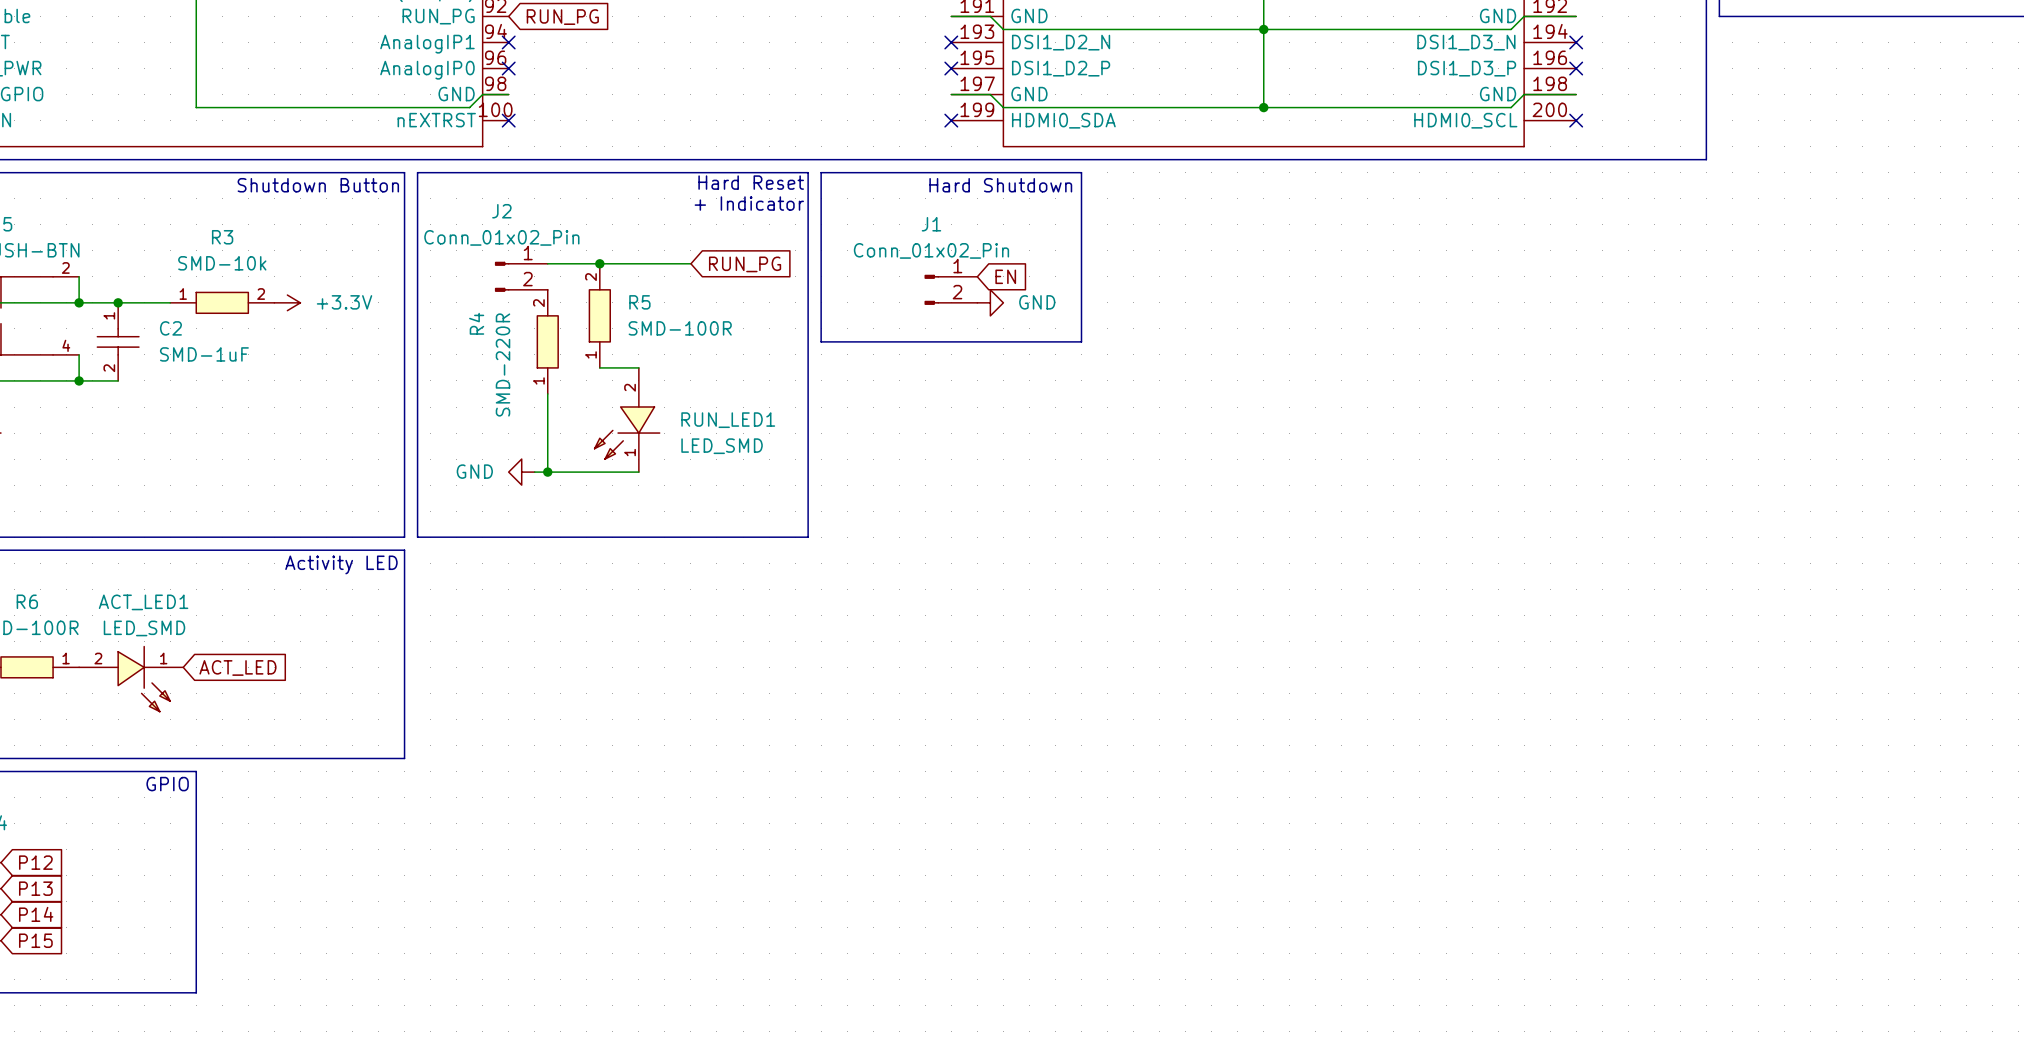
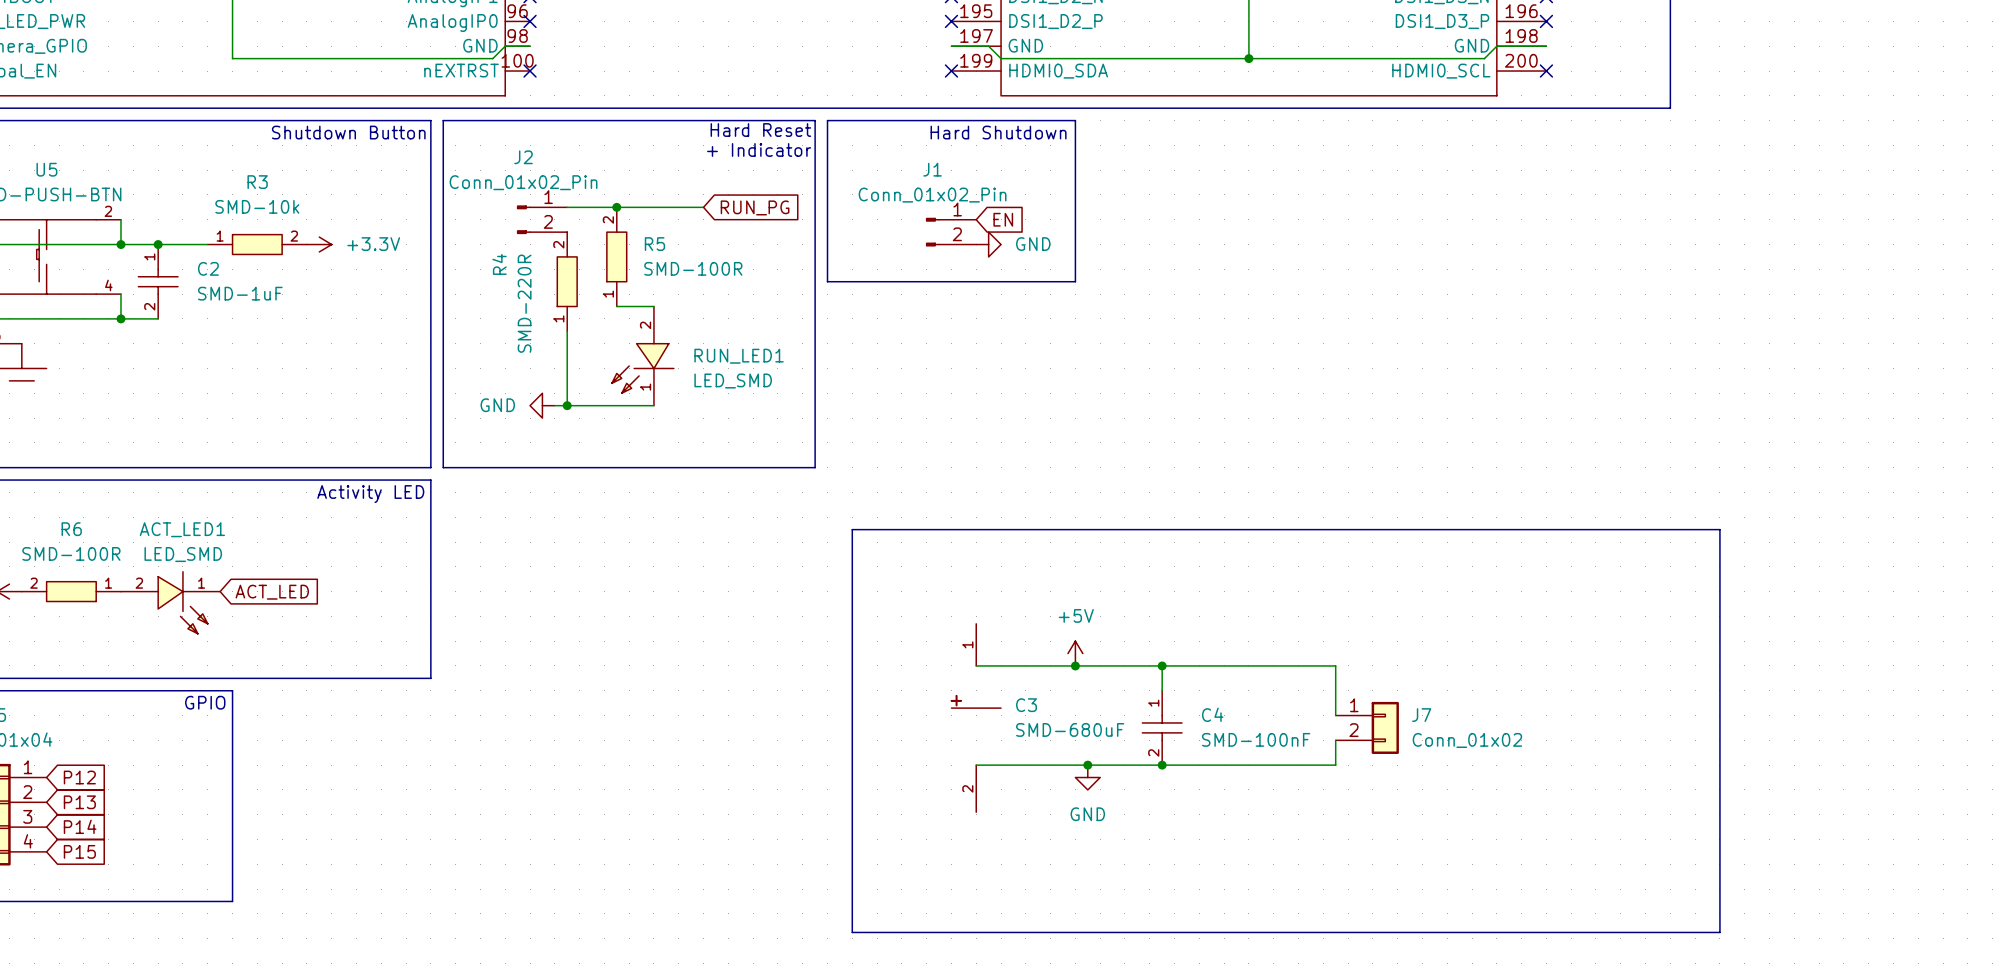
line: none -> (852, 529) (1719, 529) (1719, 932) (852, 932) (852, 529)
power symbol: none -> +5V (1075, 653)
wire: none -> (976, 665) (1335, 665) (1335, 715)
junction: none -> (1075, 665)
wire: none -> (1162, 665) (1162, 690)
junction: none -> (1162, 665)
C3: none -> SMD-680uF (976, 718)
C4: none -> SMD-100nF (1162, 727)
J7: none -> Conn_01x02 (1367, 727)
wire: none -> (1335, 740) (1335, 765) (976, 765)
junction: none -> (1087, 765)
junction: none -> (1162, 765)
power symbol: none -> GND (1087, 777)

